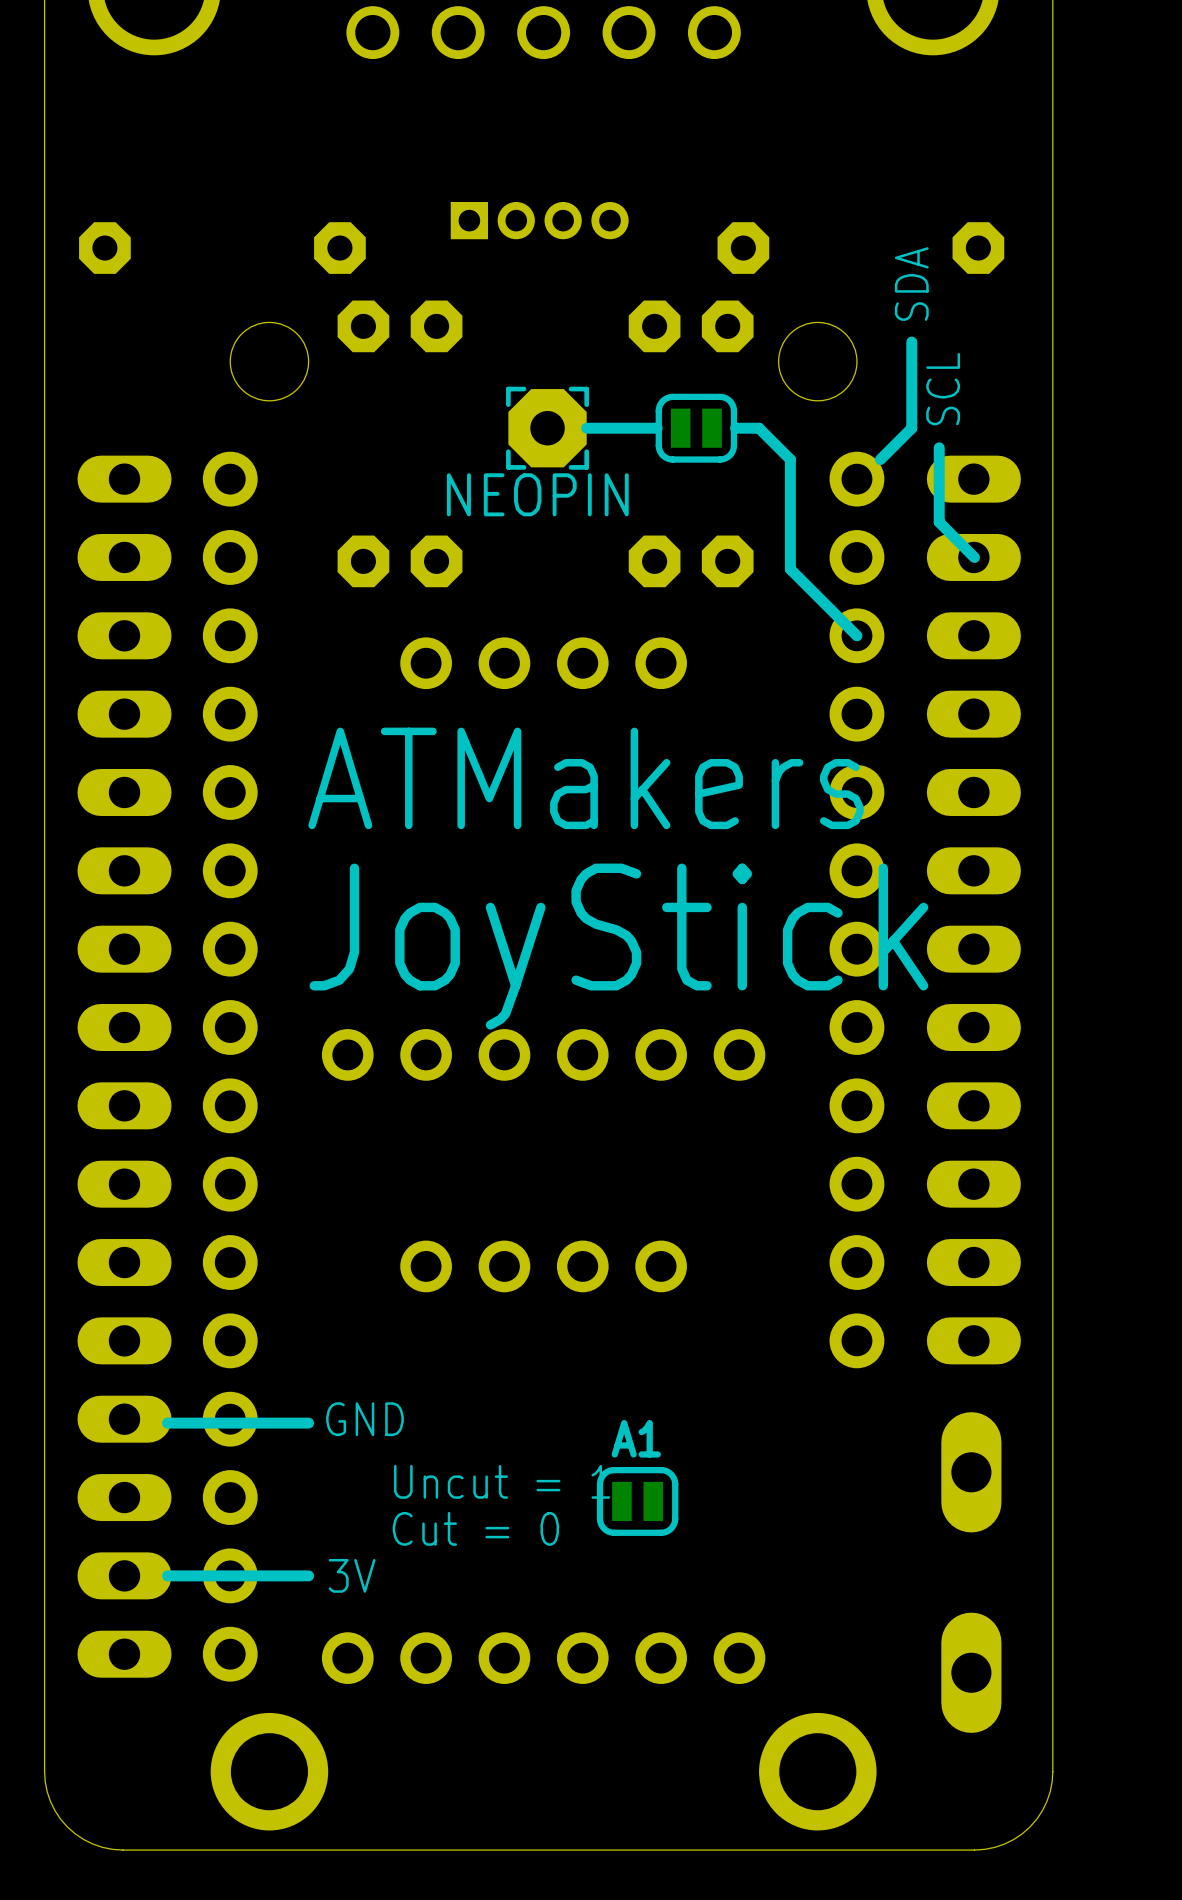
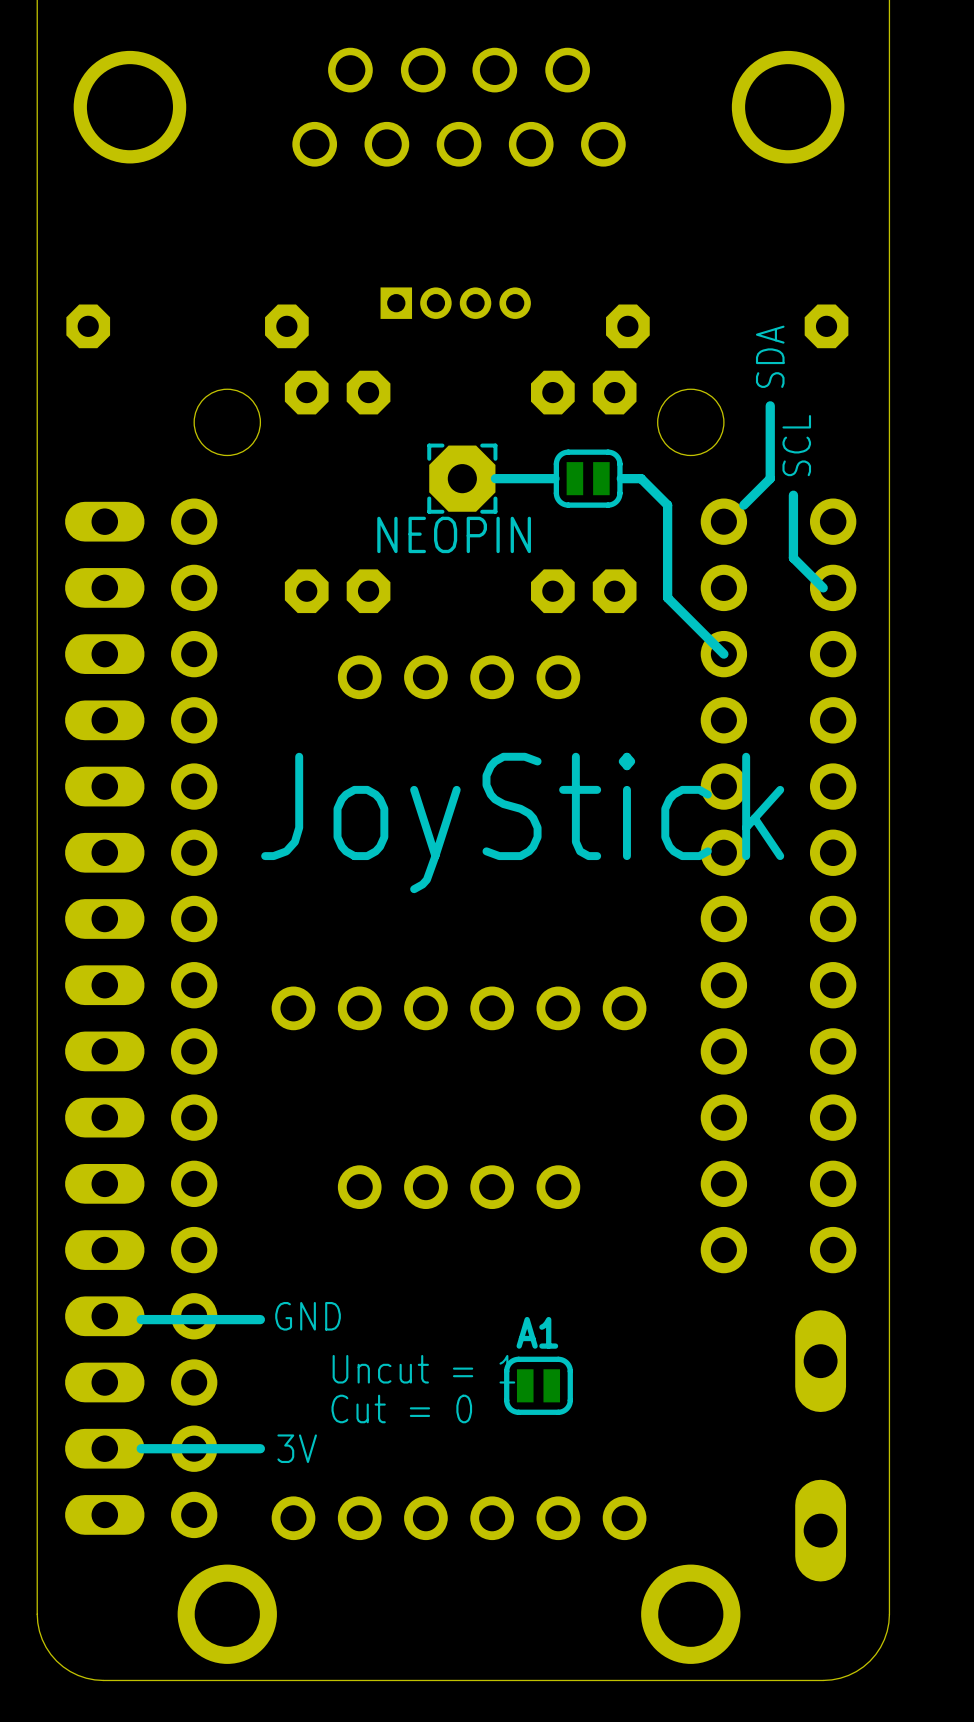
part footprint: [926, 455, 1021, 1365] -> [809, 498, 857, 1274]
text: ATMakers (586, 778) -> none
text position: JoyStick (618, 946) -> JoyStick (522, 822)

